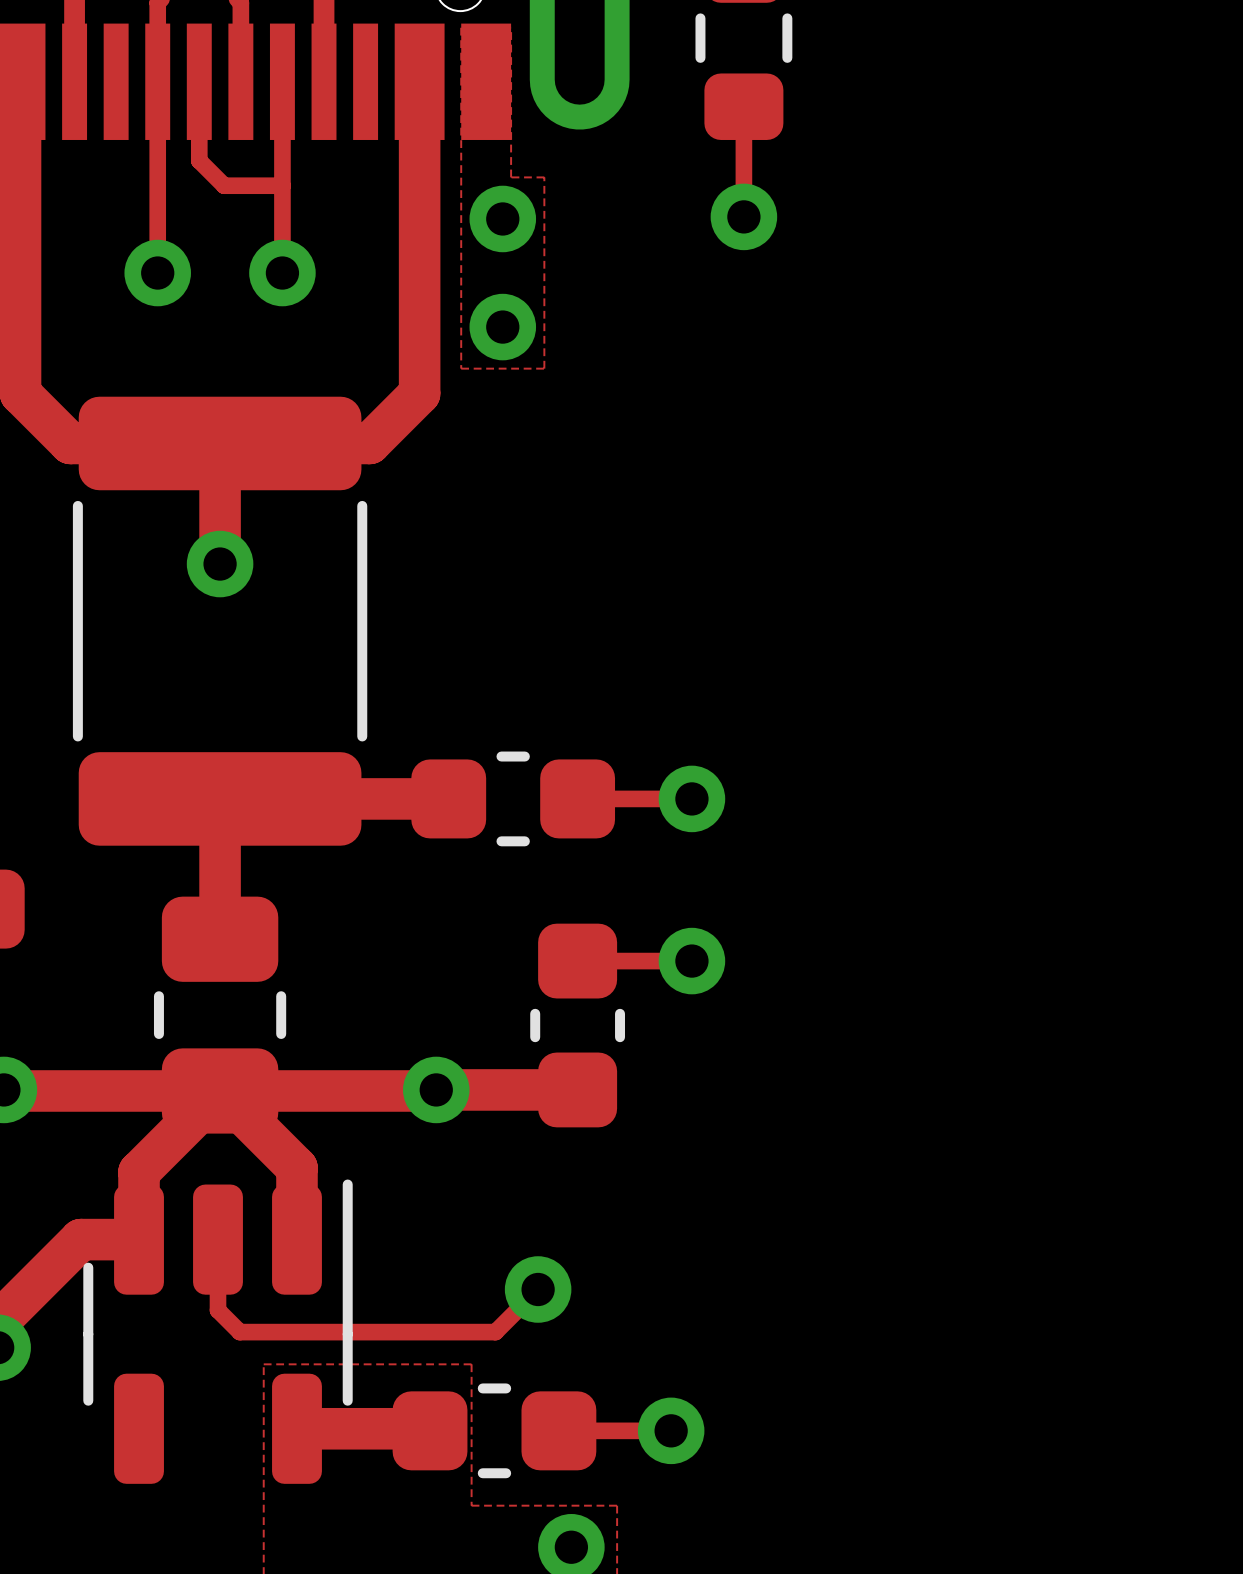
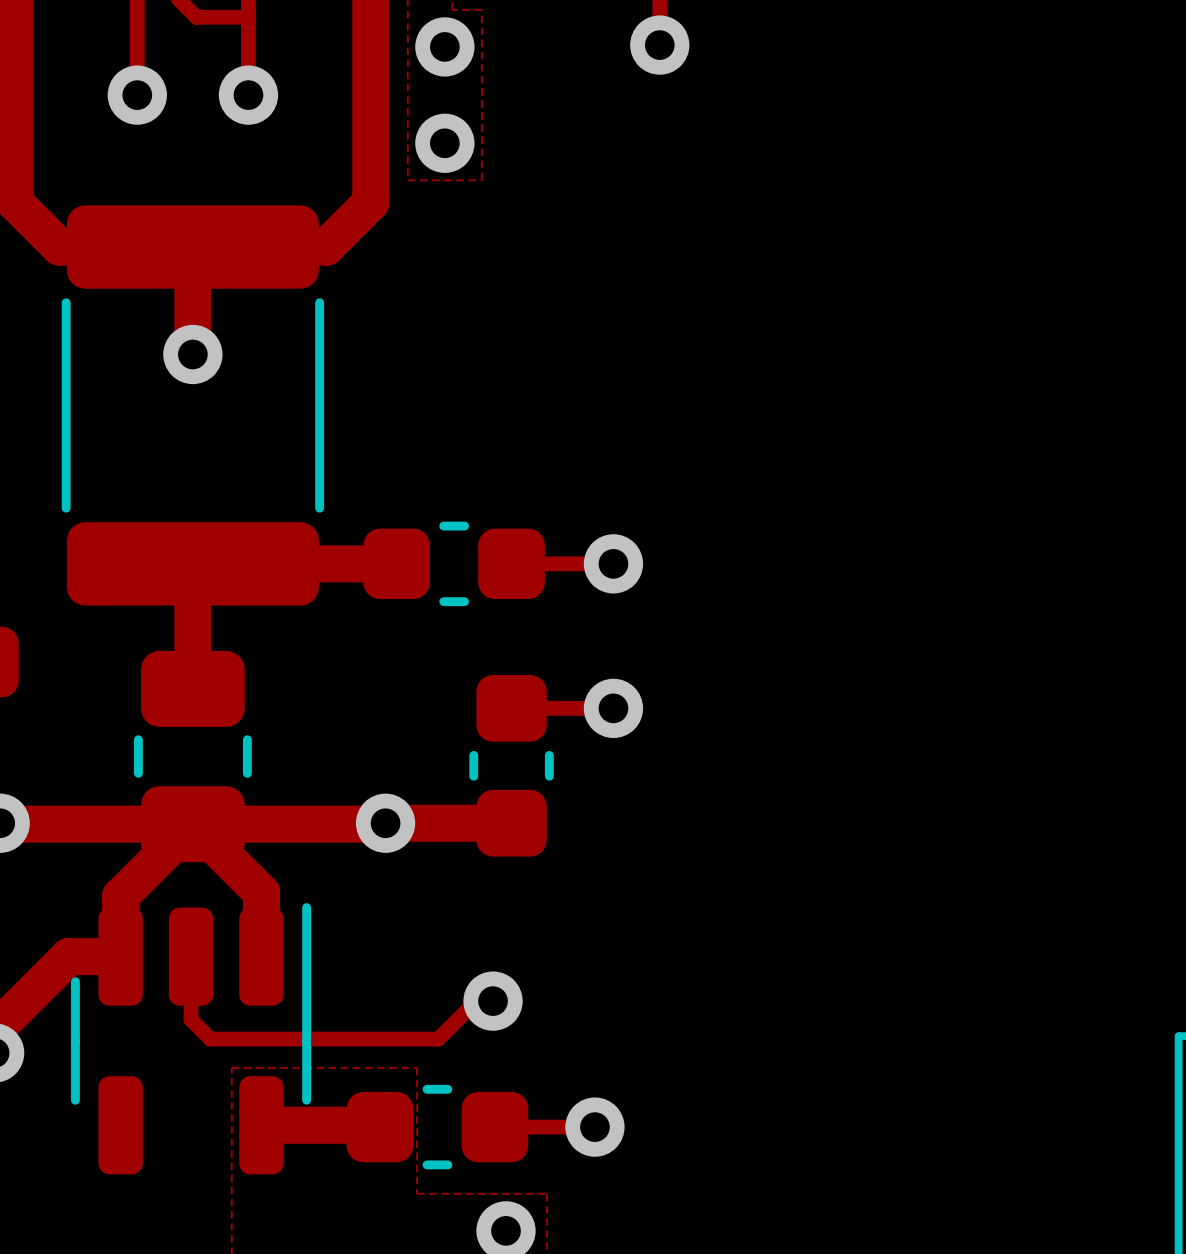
via position: (538, 1289) -> (493, 1001)

